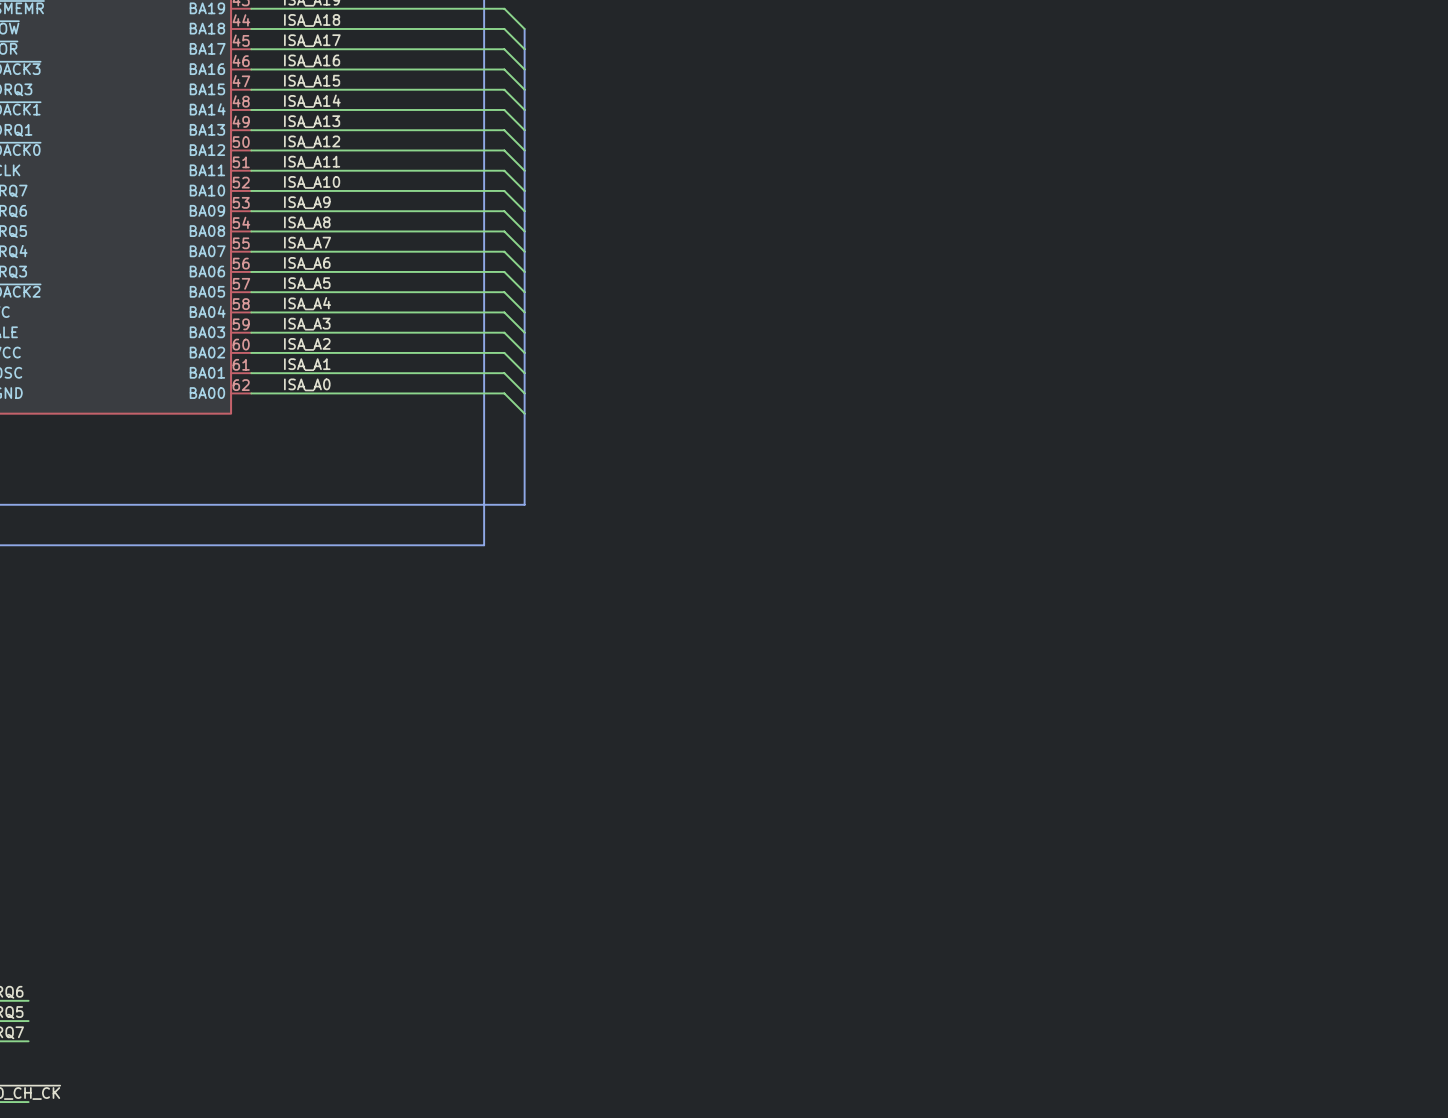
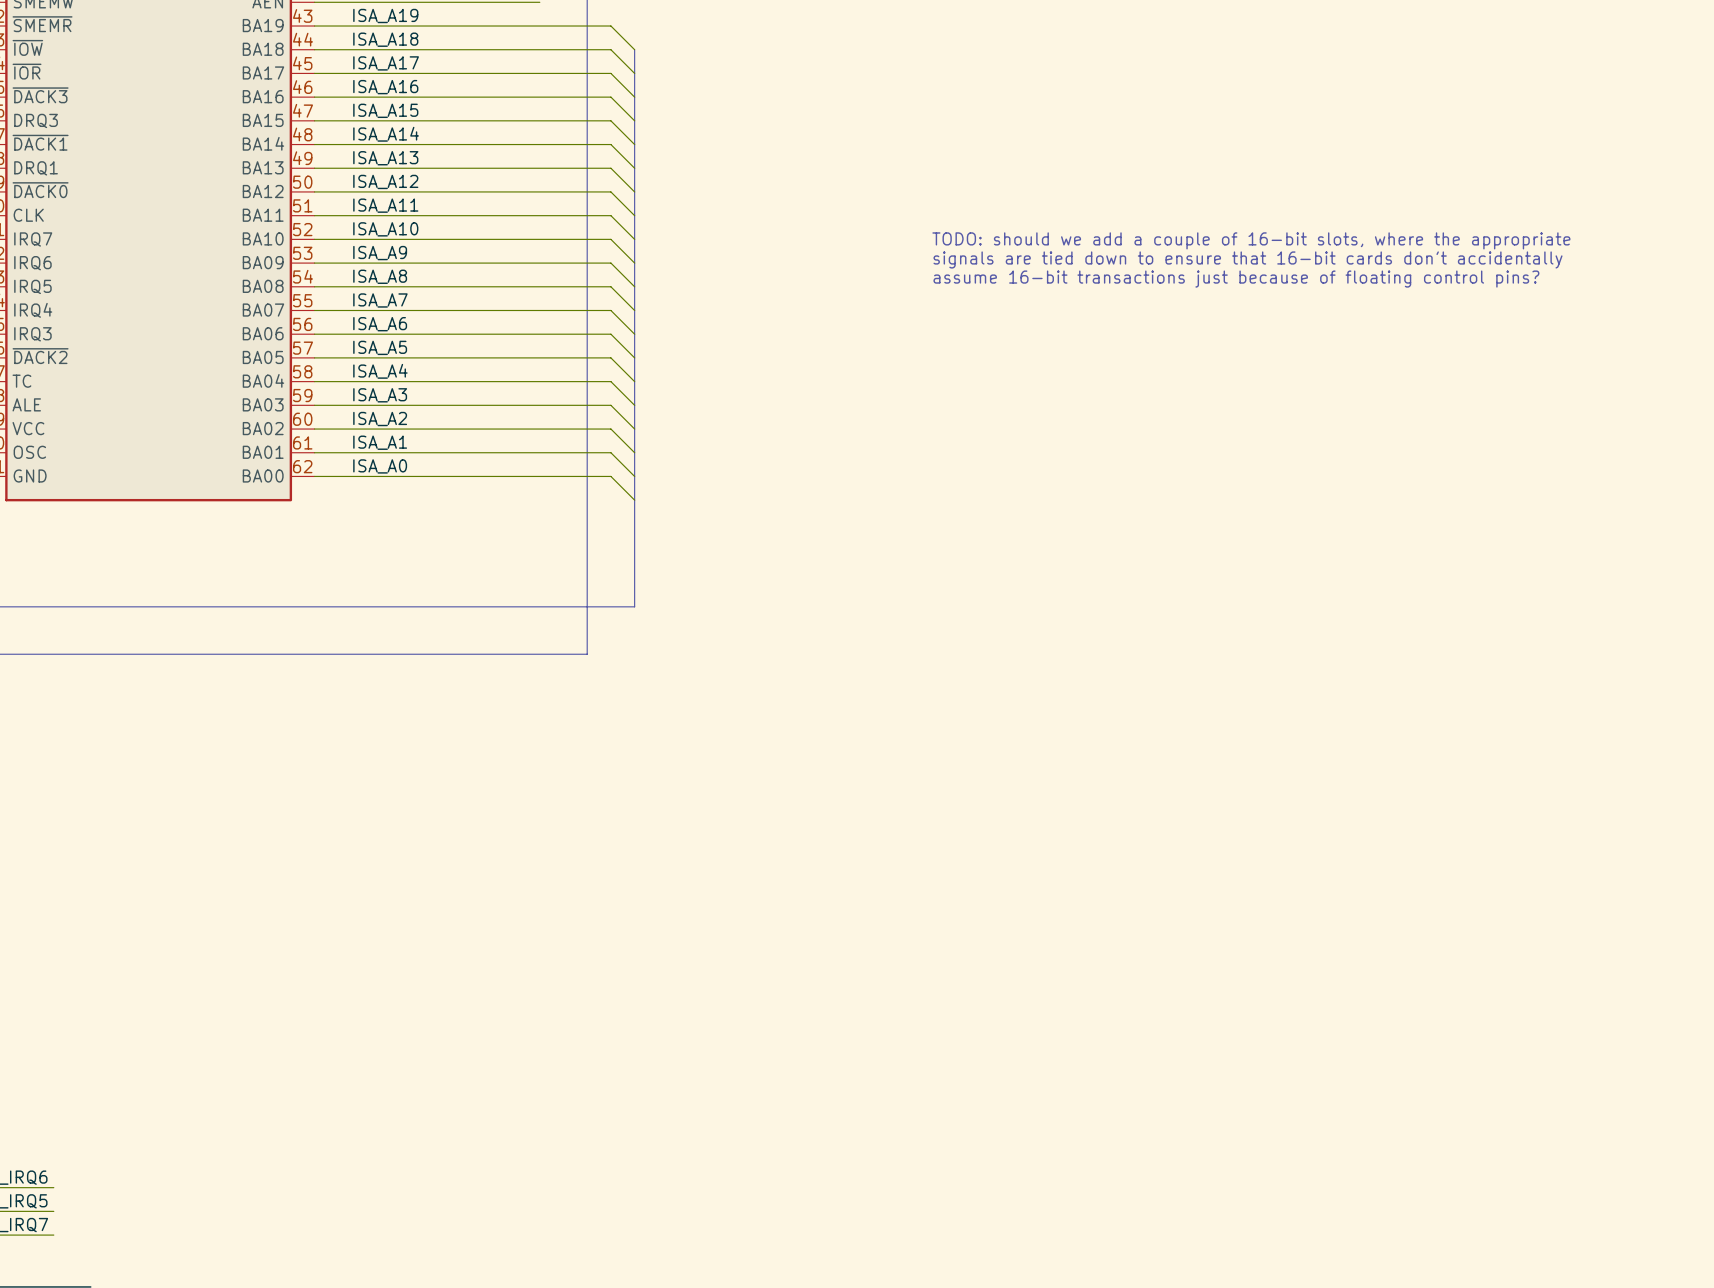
text: none -> TODO: should we add a couple of 16-bit slots, where the appropriate (1251, 240)
text: none -> signals are tied down to ensure that 16-bit cards don't accidentally (1248, 259)
text: none -> assume 16-bit transactions just because of floating control pins? (1236, 279)

